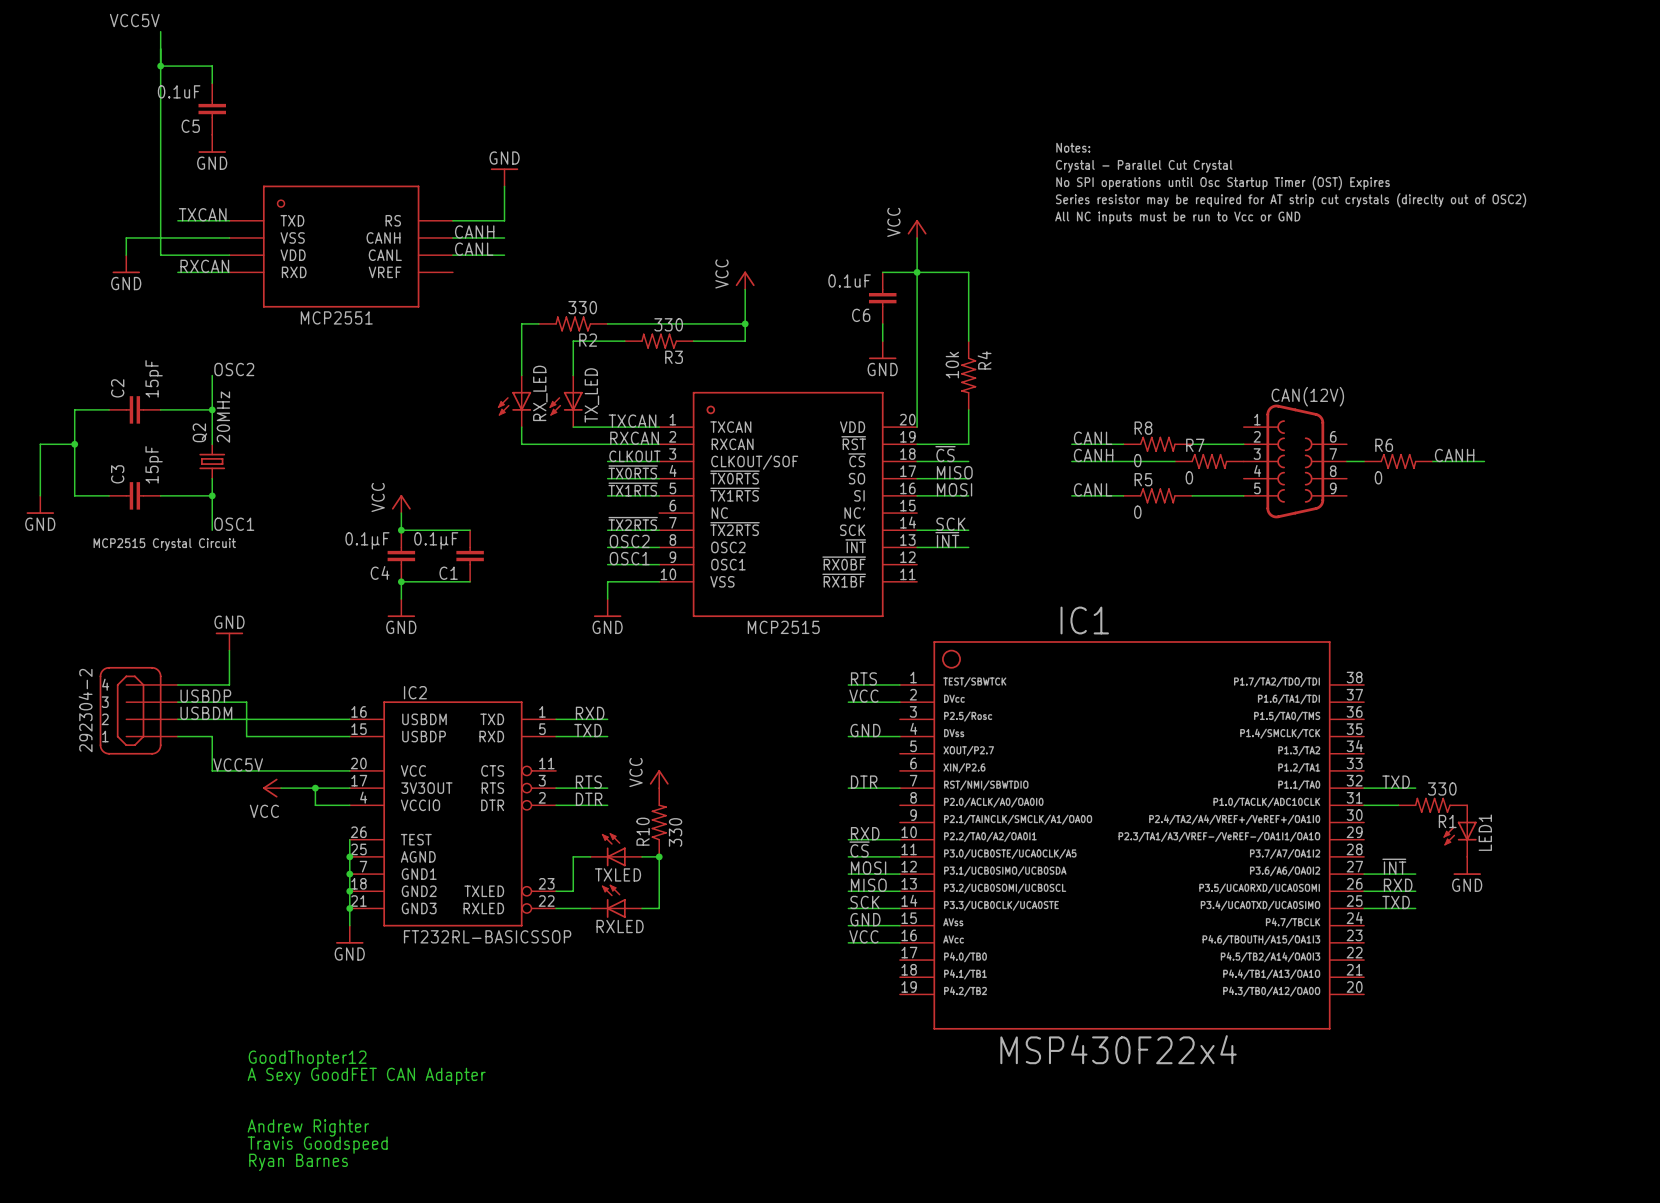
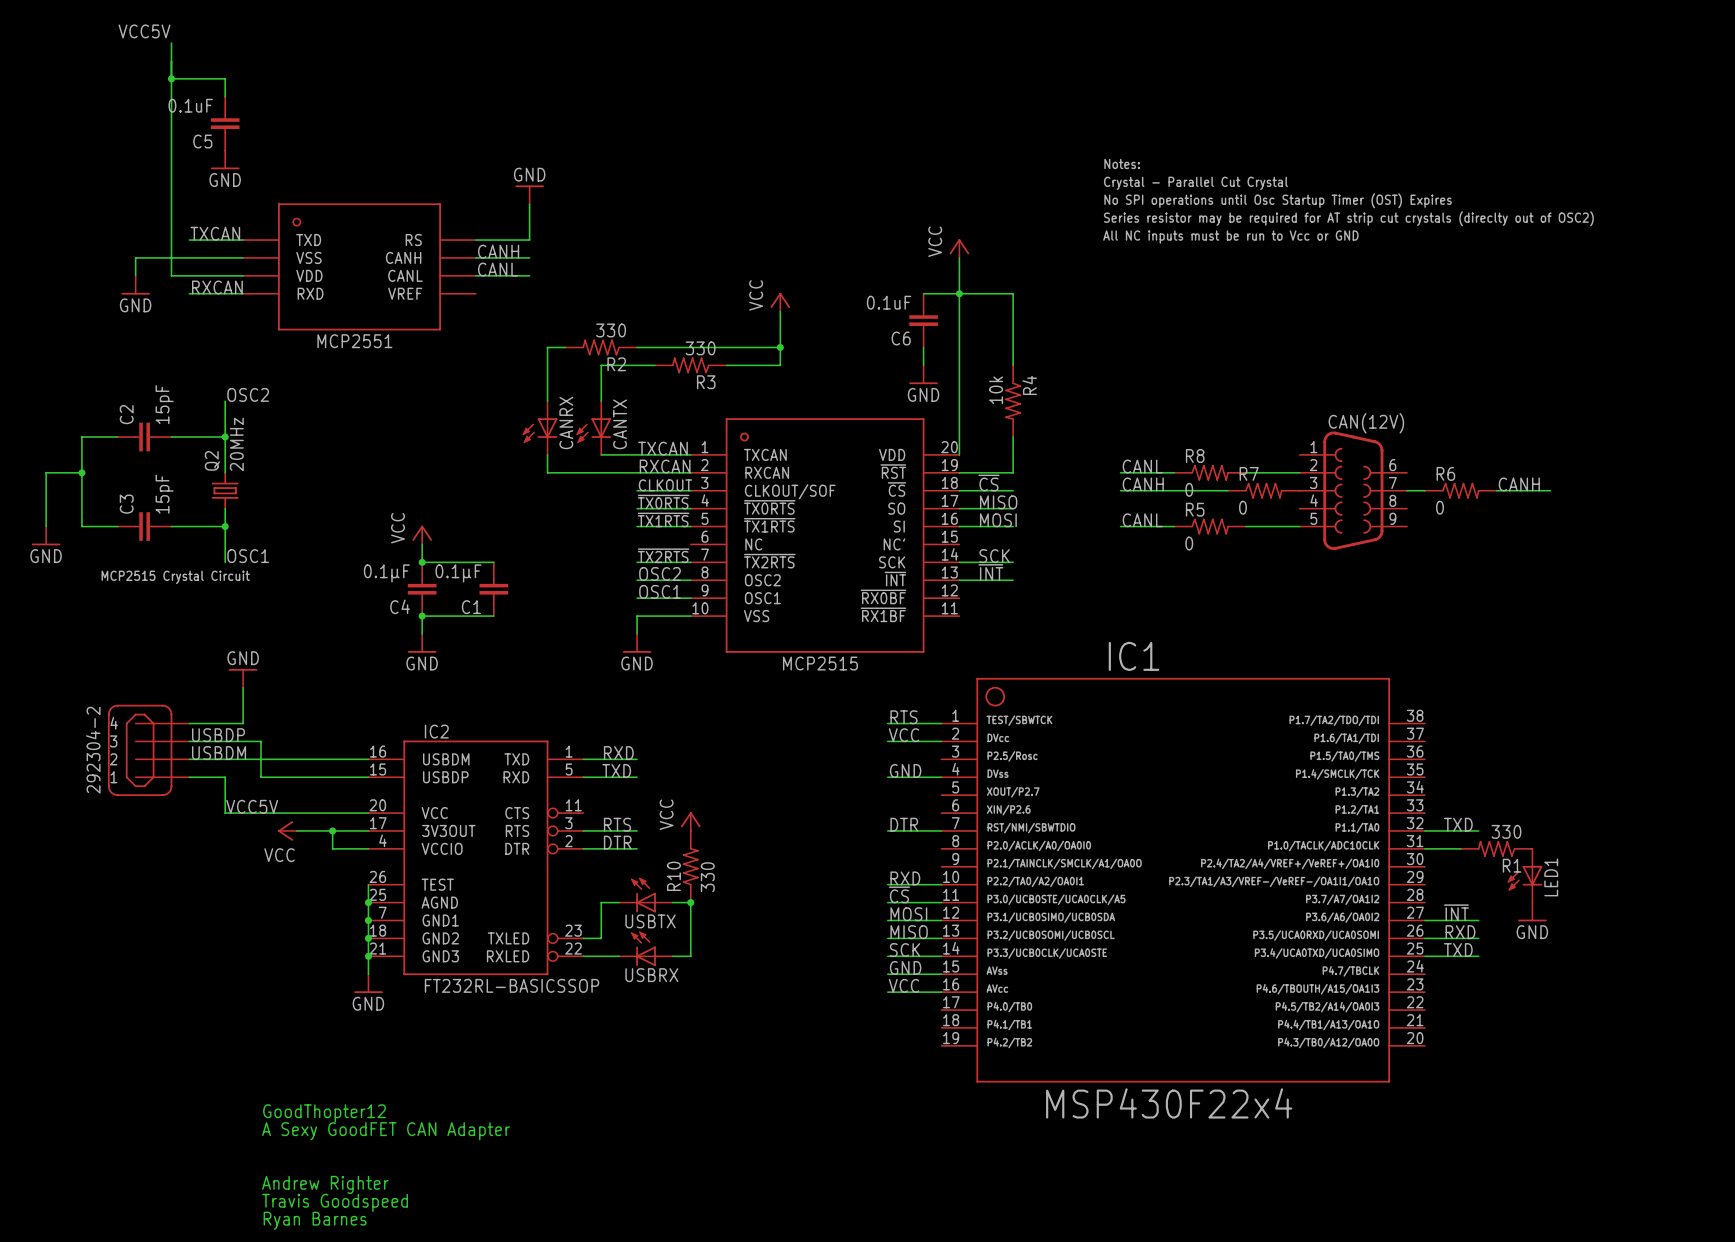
RX_LED name: RX_LED (540, 393) -> CANRX (566, 423)
TX_LED name: TX_LED (591, 395) -> CANTX (620, 424)
TXLED name: TXLED (618, 874) -> USBTX (650, 921)
RXLED name: RXLED (620, 926) -> USBRX (651, 975)

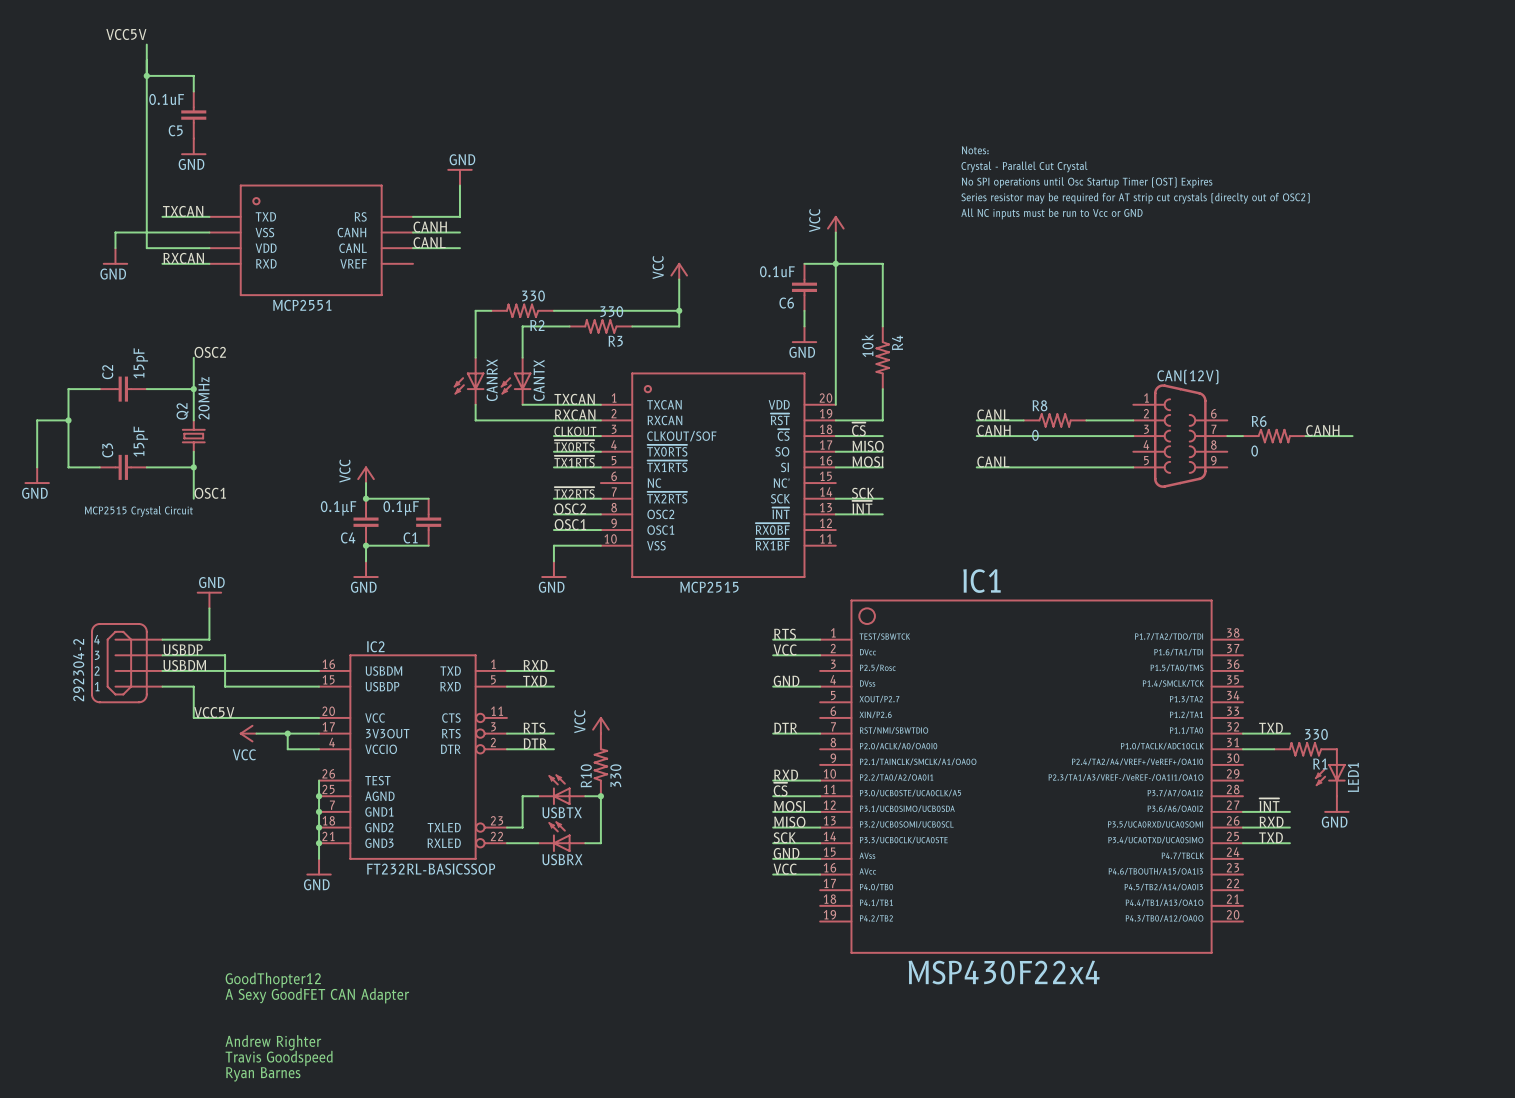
R7: 0 (1263, 490) -> none
R5: 0 (1210, 526) -> none

